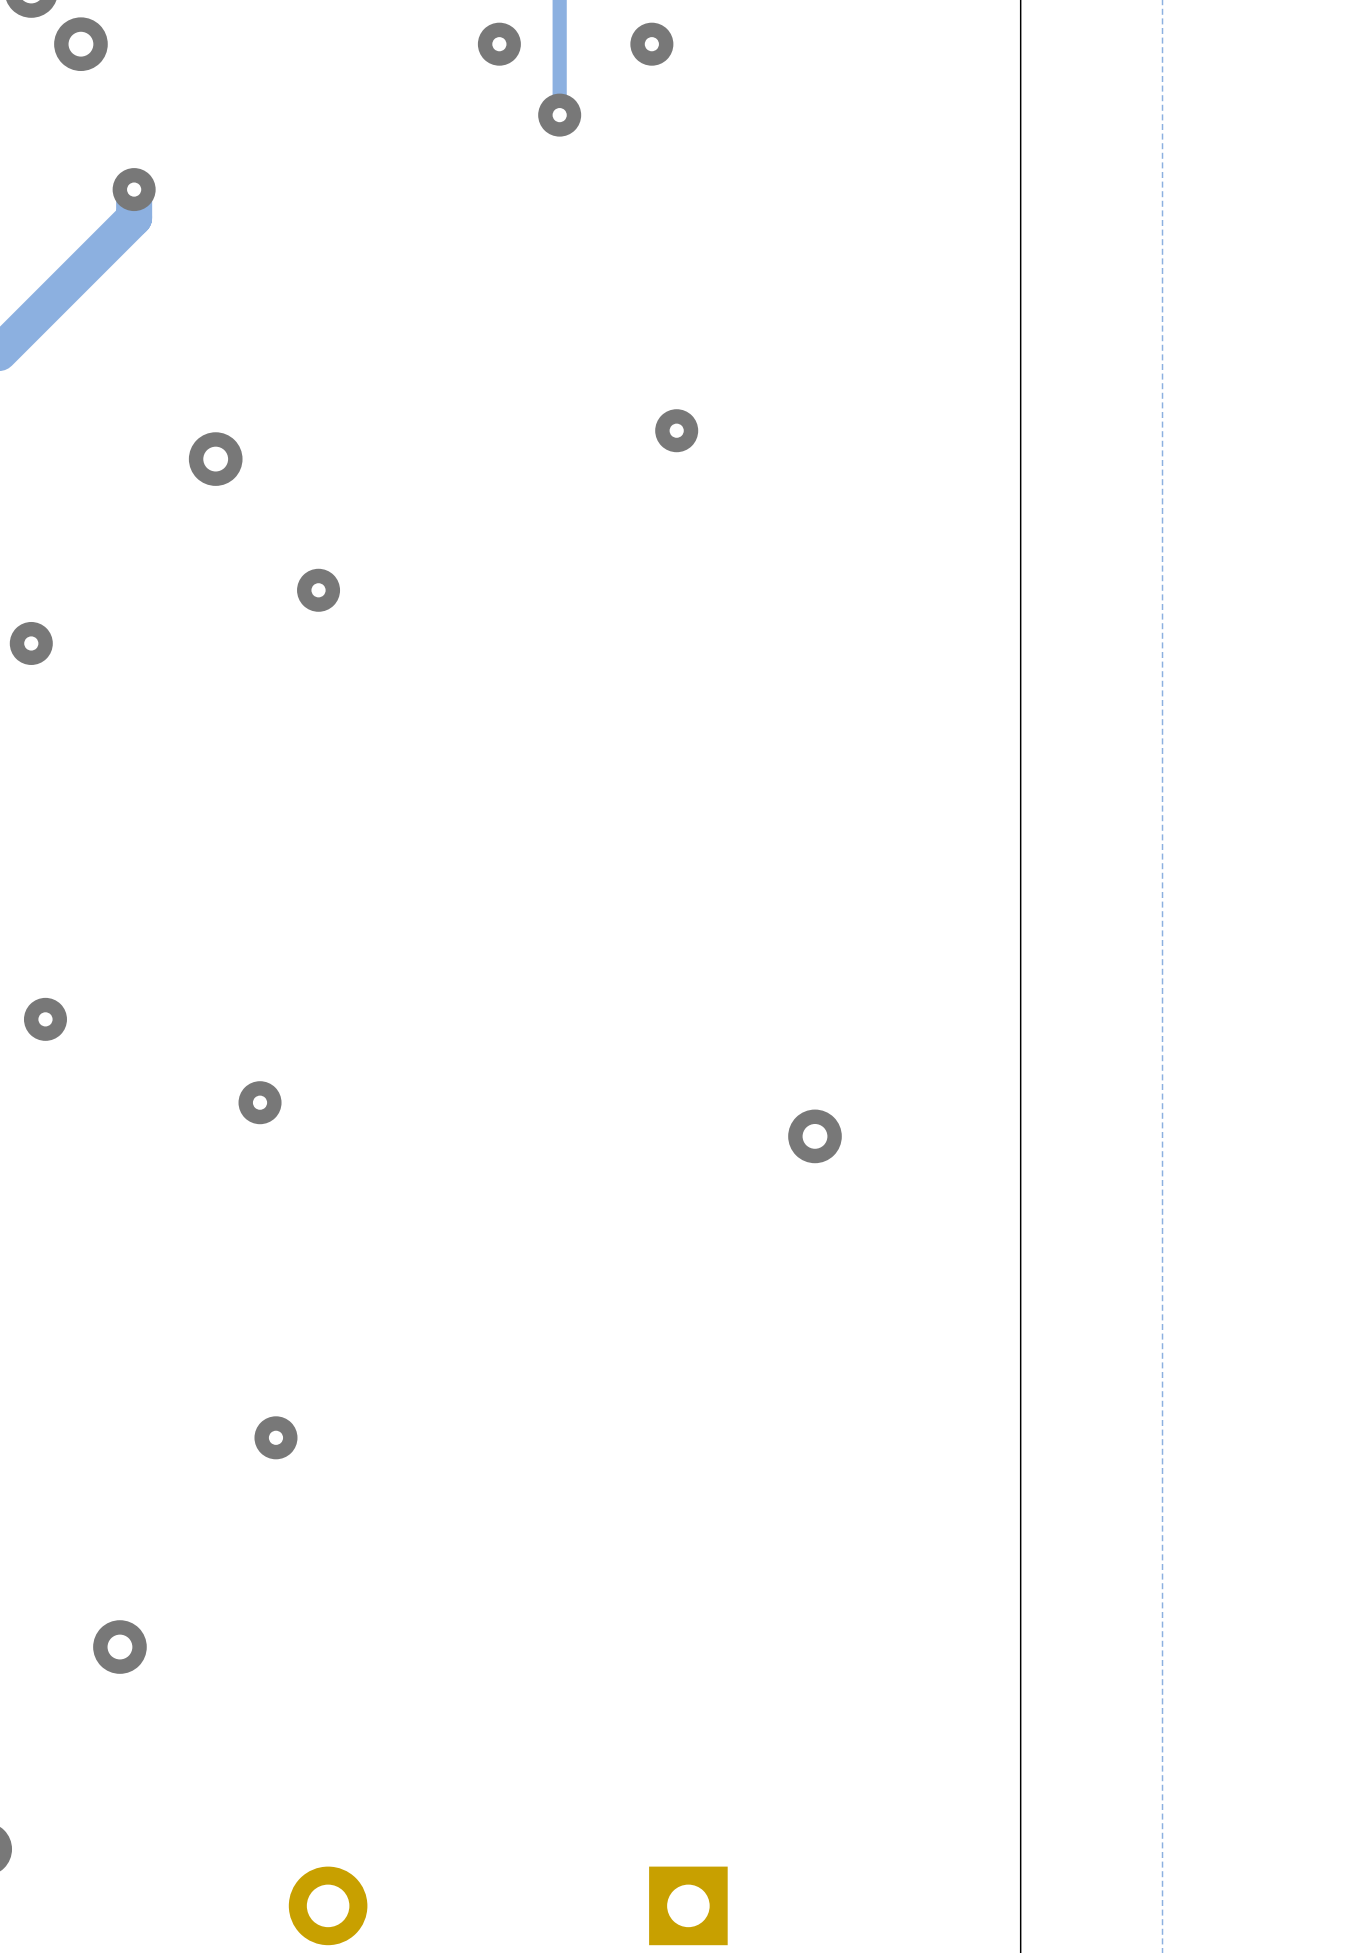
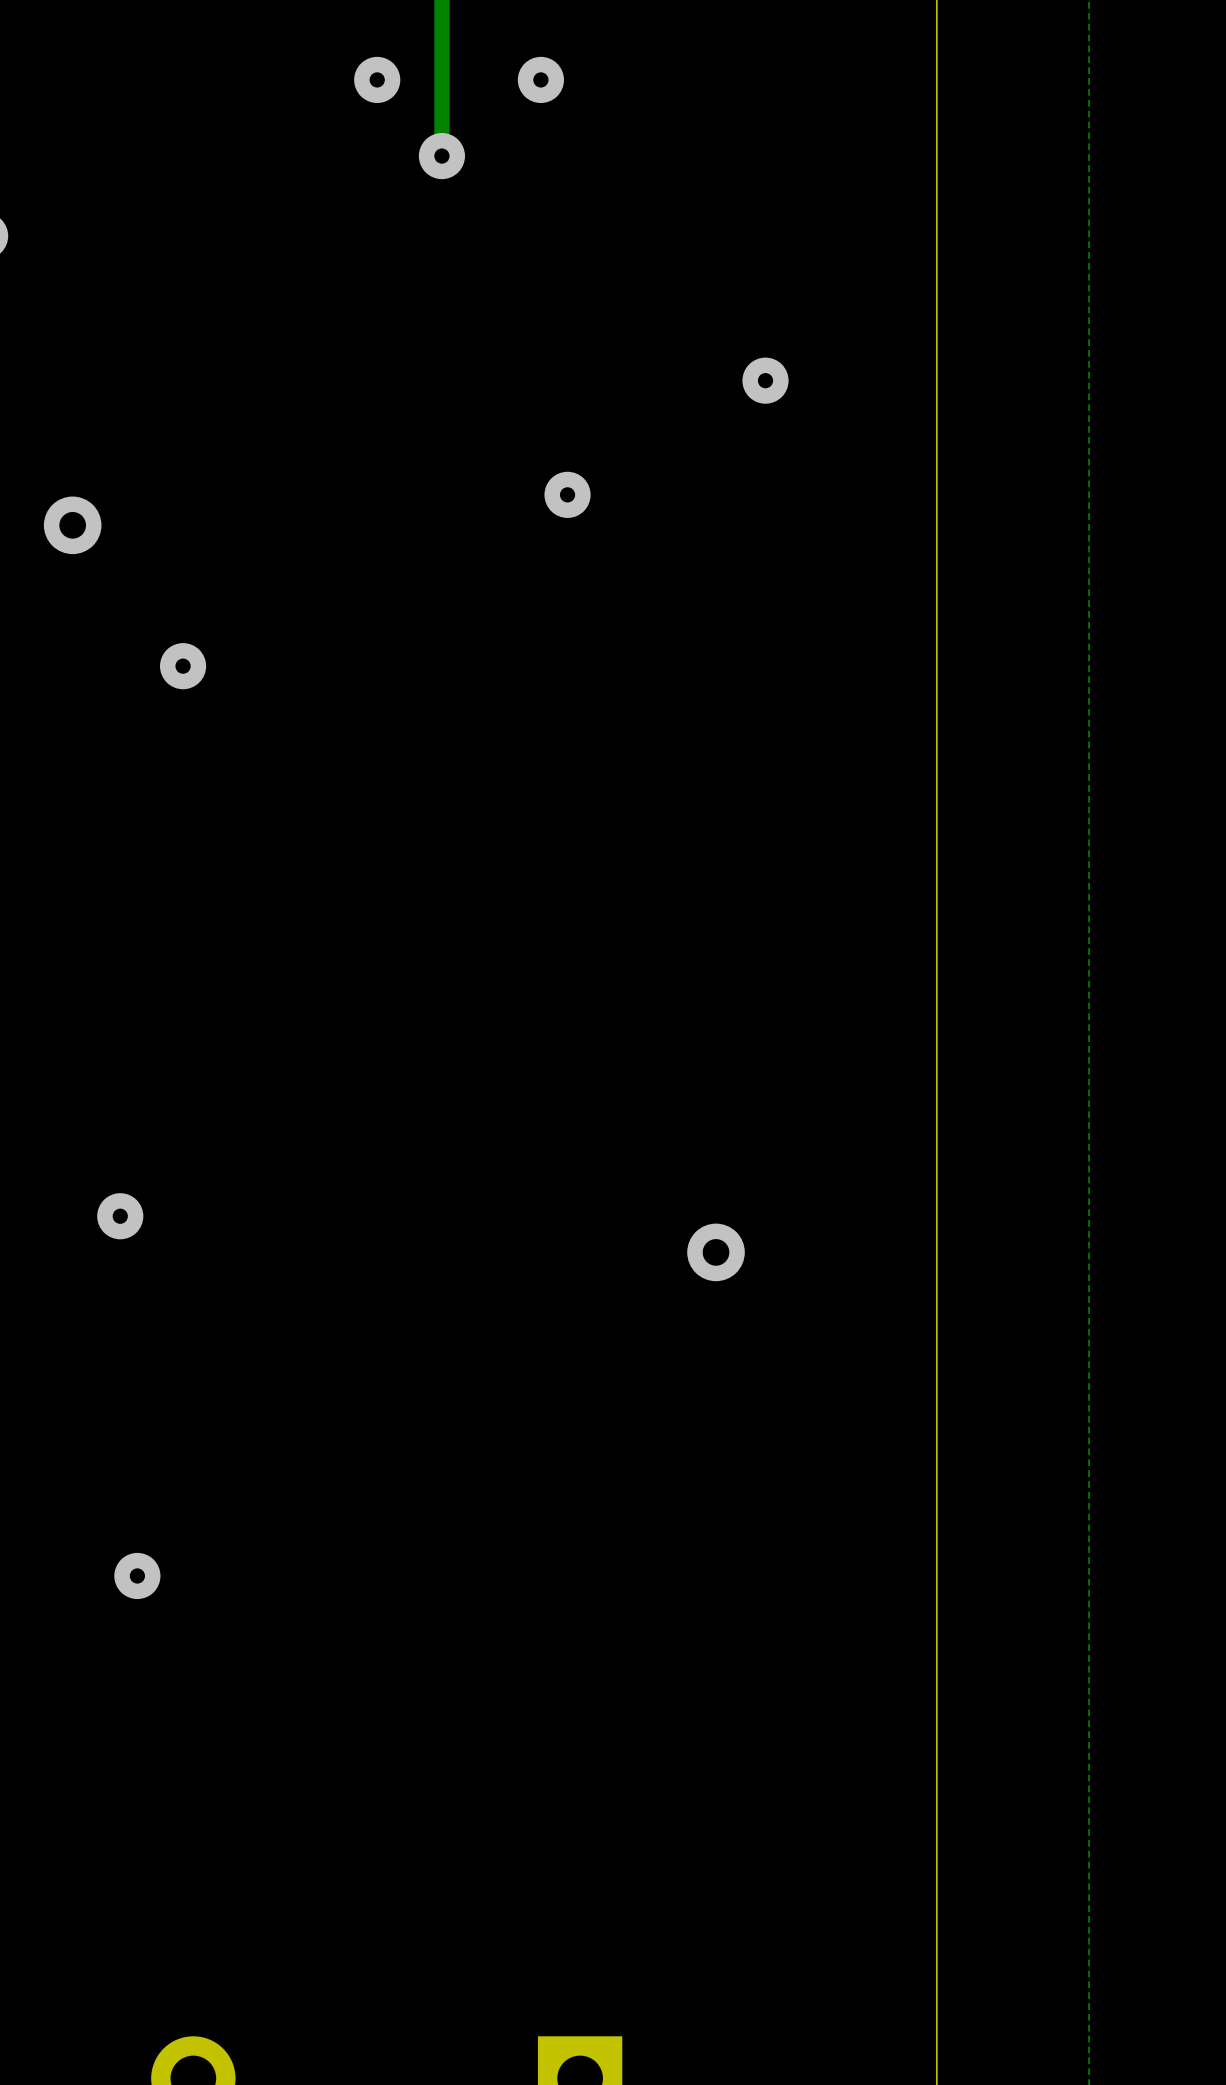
via: none -> (765, 380)

